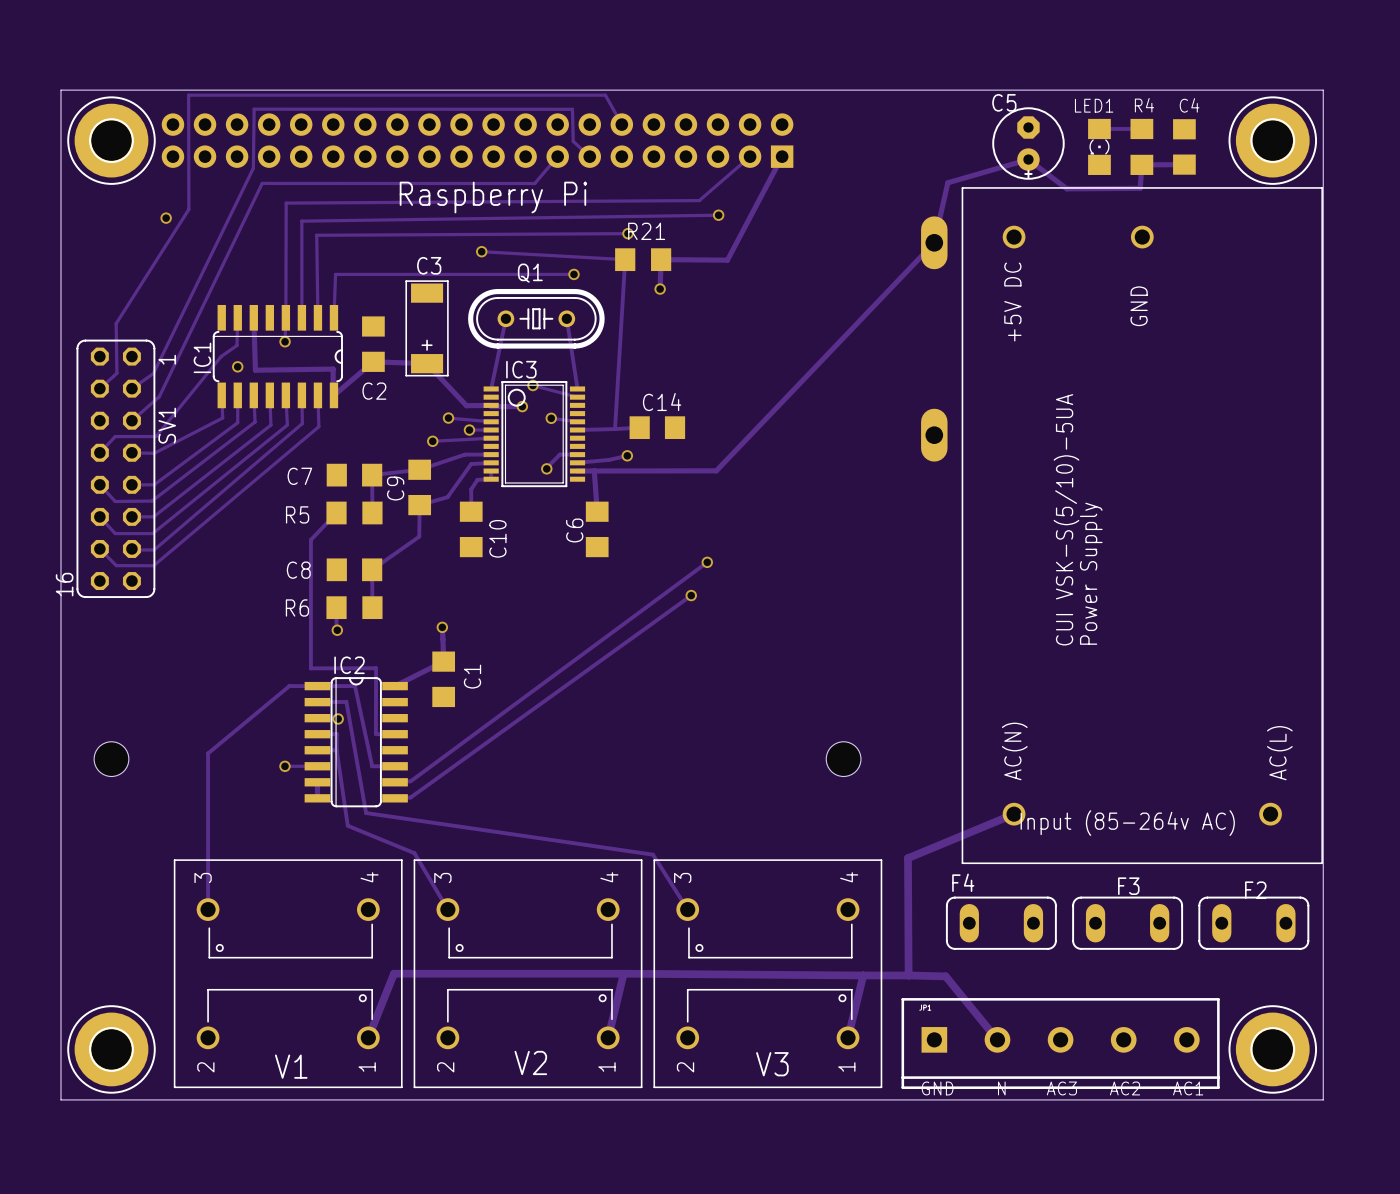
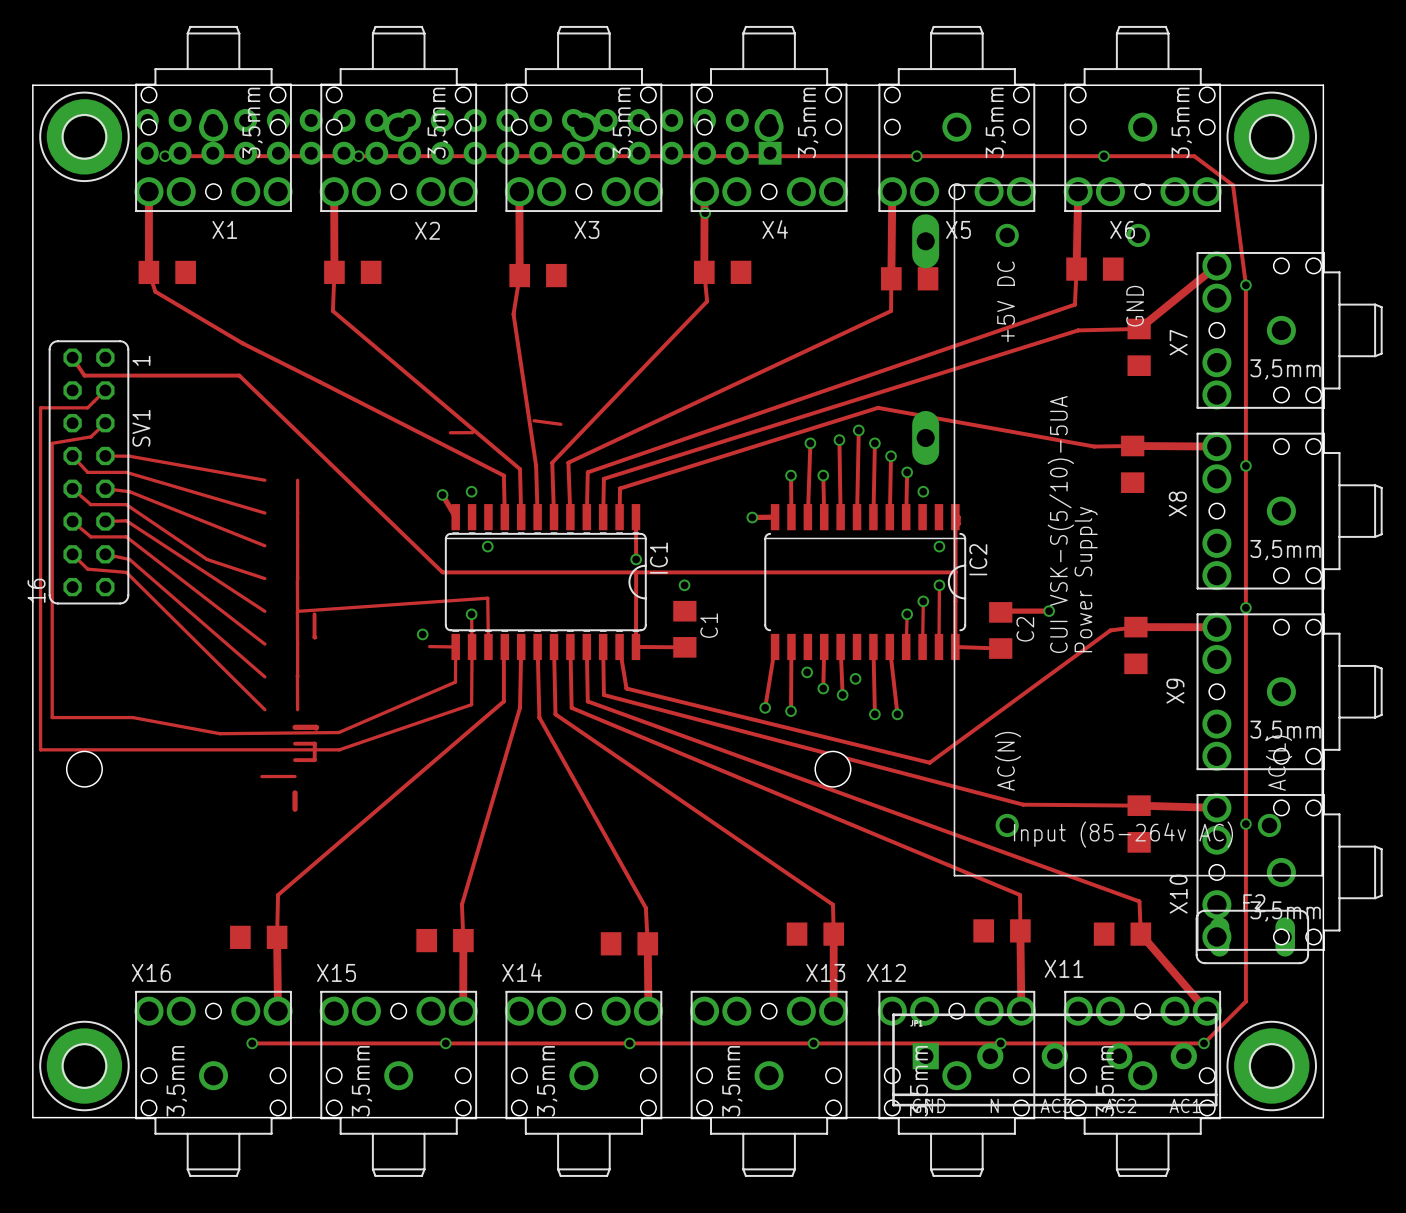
X1: none -> (213, 118)
X2: none -> (398, 118)
X3: none -> (583, 118)
X4: none -> (769, 118)
X5: none -> (956, 118)
X6: none -> (1142, 118)
track: (621, 124) (605, 95) (188, 95) (188, 209) (116, 323) (116, 373) (99, 388) -> none
track: (1099, 128) (1141, 128) -> none
C5: (1028, 143) -> none
LED1: (1099, 146) -> none
R4: (1141, 146) -> none
C4: (1184, 146) -> none
track: (557, 156) (534, 183) (262, 183) (159, 396) (131, 420) -> (429, 646) (455, 646) (455, 682) (338, 732) (219, 733) (132, 717) (52, 717) (52, 443) (90, 436) (105, 423)
track: (589, 156) (573, 141) (572, 109) (254, 109) (253, 168) (153, 373) (131, 388) -> (471, 614) (471, 704) (339, 749) (40, 749) (40, 407) (87, 407) (105, 390)
track: (750, 156) (699, 200) (286, 203) (285, 341) -> none
track: (782, 156) (727, 260) (661, 259) (660, 289) -> none
track: none -> (165, 156) (1194, 156) (1233, 185) (1245, 285) (1245, 1001) (1203, 1043) (252, 1043)
via: none -> (358, 156)
via: none -> (916, 156)
via: none -> (1103, 156)
track: (1184, 164) (1141, 164) (1140, 188) (1066, 188) (1028, 159) (947, 182) (934, 242) (716, 470) (577, 471) -> none
track: none -> (148, 191) (148, 272) (155, 291) (242, 343) (503, 475) (504, 517)
track: none -> (334, 191) (332, 311) (520, 469) (521, 517)
track: none -> (519, 191) (519, 275) (513, 314) (536, 465) (537, 517)
track: none -> (704, 191) (704, 272) (707, 301) (552, 462) (554, 517)
track: none -> (892, 191) (891, 311) (568, 462) (570, 517)
track: none -> (1078, 191) (1074, 304) (587, 472) (586, 517)
text: Raspberry Pi (493, 197) -> none
track: (718, 215) (301, 221) (301, 317) -> none
via position: (166, 218) -> (165, 156)
track: (628, 233) (316, 235) (317, 317) -> none
via: (628, 233) -> none
track: (481, 251) (625, 259) (615, 429) -> none
via: (481, 251) -> none
R21: (643, 259) -> none
track: none -> (1216, 265) (1139, 328) (1078, 330) (603, 478) (603, 517)
part: none -> (1094, 269)
part: none -> (167, 272)
part: none -> (352, 272)
part: none -> (722, 272)
track: (573, 274) (335, 274) (333, 317) -> none
via: (573, 274) -> none
part: none -> (538, 275)
part: none -> (909, 278)
via: none -> (1245, 285)
via: (660, 289) -> none
IC1 footprint: [212, 304, 343, 409] -> [444, 504, 647, 661]
track: (237, 317) (236, 345) (221, 356) (156, 436) (115, 436) (99, 452) -> (264, 513) (126, 472) (87, 472) (72, 455)
track: (253, 317) (255, 370) (333, 369) (333, 404) (333, 395) (373, 361) (427, 363) (466, 405) (522, 406) -> none
track: (505, 318) (491, 388) -> none
Q1: (536, 318) -> none
track: (566, 318) (577, 388) -> none
C3: (427, 328) -> none
X7: none -> (1289, 330)
via: (285, 341) -> none
C2 position: (373, 344) -> (1000, 630)
part: none -> (1139, 347)
track: none -> (72, 357) (84, 375) (239, 375) (442, 572) (955, 572)
IC1 name position: IC1 (202, 357) -> IC1 (658, 558)
via: (237, 366) -> none
track: (532, 385) (577, 397) -> none
via: (532, 385) -> none
C2 name rotation: 0° (374, 391) -> 90° counterclockwise (1025, 629)
C2 name position: C2 (374, 391) -> C2 (1025, 629)
track: (221, 395) (222, 418) (154, 453) (131, 452) -> (264, 480) (129, 456) (105, 455)
track: (237, 395) (237, 422) (154, 484) (131, 484) -> (264, 545) (129, 491) (105, 488)
track: (253, 395) (255, 422) (152, 501) (115, 501) (99, 484) -> (264, 578) (207, 559) (126, 504) (90, 504) (72, 488)
track: (269, 395) (270, 425) (153, 516) (131, 516) -> (264, 611) (126, 520) (105, 521)
track: (285, 395) (287, 425) (152, 533) (115, 533) (99, 516) -> (264, 644) (126, 536) (90, 536) (72, 521)
track: (301, 395) (302, 423) (154, 549) (131, 548) -> (264, 676) (129, 559) (105, 554)
track: (317, 395) (318, 426) (153, 565) (116, 565) (99, 548) -> (264, 709) (126, 572) (87, 569) (72, 554)
via: (522, 406) -> none
track: (448, 418) (491, 421) -> none
via: (448, 418) -> none
via: (551, 418) -> none
track: (639, 427) (615, 429) -> none
C14: (657, 427) -> none
track: none -> (858, 430) (857, 517)
via: none -> (858, 430)
track: (615, 429) (577, 429) -> none
via: (469, 430) -> none
IC3: (534, 434) -> none
track: none -> (839, 440) (840, 517)
via: none -> (839, 440)
track: (491, 438) (432, 441) -> none
track: none -> (810, 443) (807, 517)
via: none -> (810, 443)
track: none -> (874, 443) (873, 517)
via: none -> (874, 443)
via: (432, 441) -> none
track: none -> (1216, 446) (1094, 446) (878, 407) (620, 488) (619, 517)
track: none -> (891, 456) (889, 517)
via: none -> (891, 456)
track: (491, 454) (464, 454) (419, 469) (372, 475) (372, 512) -> none
track: (577, 454) (559, 454) (546, 468) -> none
track: (627, 455) (609, 459) (577, 462) -> none
via: (627, 455) -> none
part: none -> (1132, 464)
track: (491, 462) (471, 464) (447, 497) (419, 505) (419, 536) (372, 569) (372, 607) -> none
via: none -> (1245, 465)
via: (546, 468) -> none
track: none -> (907, 472) (906, 517)
via: none -> (907, 472)
track: (594, 470) (597, 511) -> none
track: (491, 471) (491, 479) (477, 479) (471, 489) (471, 511) -> none
track: none -> (791, 475) (791, 517)
via: none -> (791, 475)
track: none -> (823, 475) (824, 517)
via: none -> (823, 475)
C7: (354, 475) -> none
track: none -> (297, 480) (297, 611)
C9: (419, 487) -> none
via: none -> (471, 491)
via: none -> (923, 491)
track: none -> (442, 494) (455, 517)
via: none -> (442, 494)
X8: none -> (1289, 511)
track: (336, 512) (310, 539) (310, 668) (376, 668) (375, 734) (395, 734) -> none
R5: (354, 512) -> none
track: none -> (635, 517) (636, 559)
via: none -> (752, 517)
track: none -> (775, 517) (752, 517)
track: none -> (955, 517) (958, 517) (958, 523) (955, 523) (955, 572)
C10: (471, 529) -> none
C6: (597, 529) -> none
via: none -> (487, 546)
via: none -> (939, 546)
via: none -> (636, 559)
track: (707, 562) (410, 781) (395, 782) -> none
via: (707, 562) -> none
track: none -> (636, 572) (635, 646) (684, 647)
track: none -> (955, 572) (955, 646) (1000, 648)
C8: (354, 569) -> none
via: none -> (684, 585)
track: none -> (939, 585) (938, 646)
via: none -> (939, 585)
track: (691, 595) (410, 797) (395, 798) -> none
via: (691, 595) -> none
track: none -> (923, 601) (922, 646)
via: none -> (923, 601)
via: none -> (1245, 607)
track: none -> (297, 611) (297, 709)
track: none -> (297, 611) (487, 598) (488, 646)
track: none -> (1049, 611) (1000, 612)
via: none -> (1049, 611)
R6: (354, 607) -> none
via: none -> (471, 614)
track: none -> (907, 614) (906, 646)
via: none -> (907, 614)
track: none -> (1216, 627) (1135, 627) (1110, 630) (929, 762) (626, 688) (619, 646)
track: (442, 627) (443, 661) (395, 686) -> none
via: (337, 630) -> none
part: none -> (1135, 645)
track: none -> (504, 646) (503, 701) (278, 895) (278, 1011)
track: none -> (521, 646) (520, 707) (461, 904) (463, 1011)
track: none -> (537, 646) (539, 717) (645, 907) (648, 1011)
track: none -> (554, 646) (555, 714) (832, 904) (833, 1011)
track: none -> (570, 646) (571, 707) (1020, 895) (1021, 1011)
track: none -> (586, 646) (587, 701) (1139, 901) (1140, 934) (1207, 1011)
track: none -> (603, 646) (603, 694) (1023, 804) (1216, 807)
track: none -> (775, 646) (765, 707)
track: none -> (791, 646) (791, 711)
track: none -> (824, 646) (823, 688)
track: none -> (840, 646) (842, 694)
track: none -> (873, 646) (874, 714)
track: none -> (889, 646) (897, 714)
via: none -> (807, 672)
IC2 name position: IC2 (349, 665) -> IC2 (978, 559)
via: none -> (855, 678)
C1 name position: C1 (472, 676) -> C1 (709, 625)
IC2 footprint: [304, 677, 408, 808] -> [764, 504, 967, 661]
C1 position: (443, 679) -> (684, 629)
via: none -> (823, 688)
X9: none -> (1289, 691)
via: none -> (842, 694)
via: none -> (765, 707)
track: (317, 702) (346, 701) (366, 813) (653, 854) (687, 909) -> none
via: none -> (791, 711)
via: none -> (874, 714)
via: none -> (897, 714)
via: (338, 718) -> none
track: (336, 750) (347, 825) (414, 853) (447, 909) -> none
via: (284, 766) -> none
track: (395, 766) (372, 766) (354, 686) (289, 686) (208, 753) (208, 909) -> none
part: none -> (1139, 824)
via: none -> (1245, 824)
track: (1014, 814) (907, 858) (908, 975) -> none
X10: none -> (1289, 872)
part: none -> (1002, 930)
part: none -> (815, 934)
part: none -> (1122, 934)
part: none -> (258, 937)
F4: (1001, 923) -> none
F3: (1127, 923) -> none
part: none -> (445, 940)
part: none -> (629, 943)
part: (288, 973) -> none
part: (528, 973) -> none
track: (623, 973) (863, 975) -> none
track: (623, 973) (393, 973) (368, 1037) -> none
track: (623, 973) (608, 1037) -> none
part: (767, 973) -> none
track: (863, 975) (908, 975) -> none
track: (863, 975) (848, 1037) -> none
track: (908, 975) (945, 976) (997, 1039) -> none
via: none -> (252, 1043)
via: none -> (445, 1043)
via: none -> (629, 1043)
via: none -> (813, 1043)
via: none -> (1000, 1043)
via: none -> (1203, 1043)
text: V2 (530, 1062) -> none
text: V3 (772, 1064) -> none
X16: none -> (213, 1083)
text: V1 (291, 1066) -> none
X15: none -> (398, 1083)
X14: none -> (583, 1083)
X13: none -> (769, 1083)
X12: none -> (956, 1083)
X11: none -> (1142, 1083)

